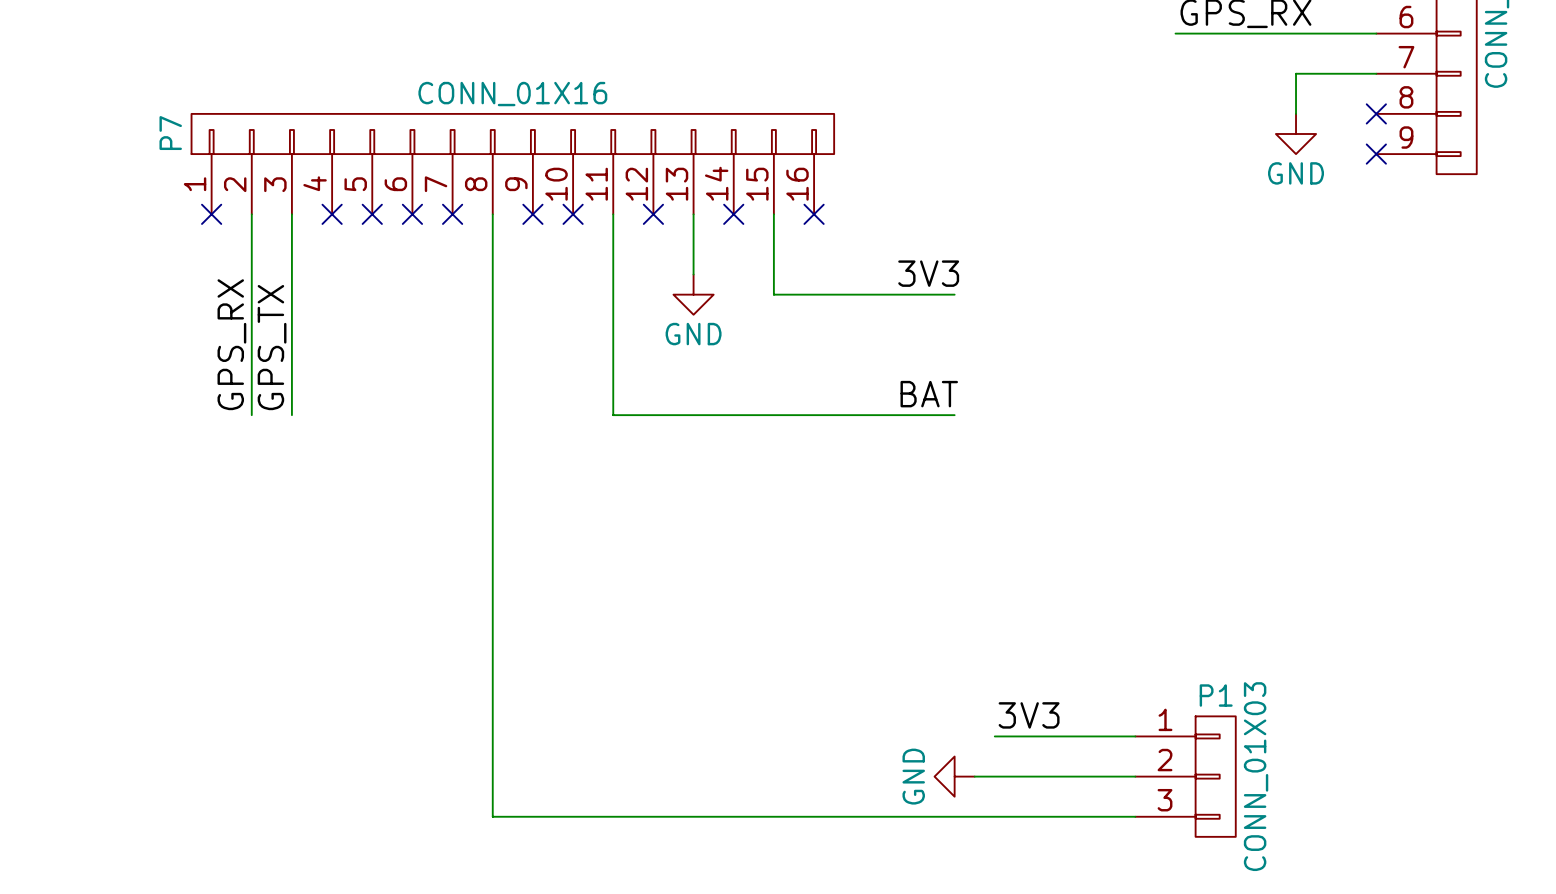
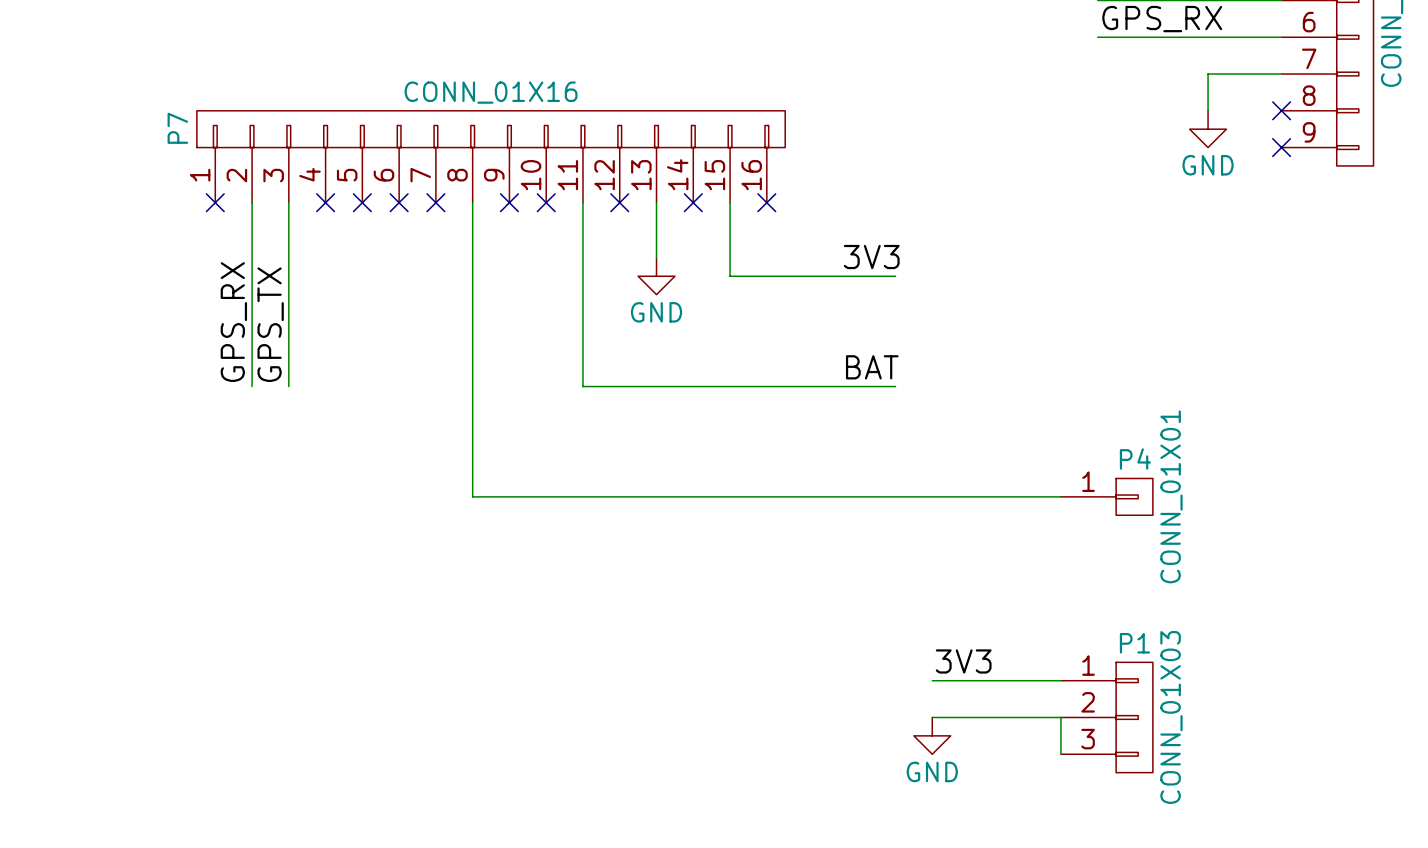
wire: (492, 535) (492, 816) (1135, 816) -> (472, 496) (1060, 496)
P4: none -> CONN_01X01 (1106, 496)
power symbol rotation: 0° (954, 776) -> 90° counterclockwise (932, 735)
power symbol position: GND (954, 776) -> GND (932, 735)
wire: (974, 776) (994, 776) -> none
wire: none -> (1060, 717) (1060, 754)

